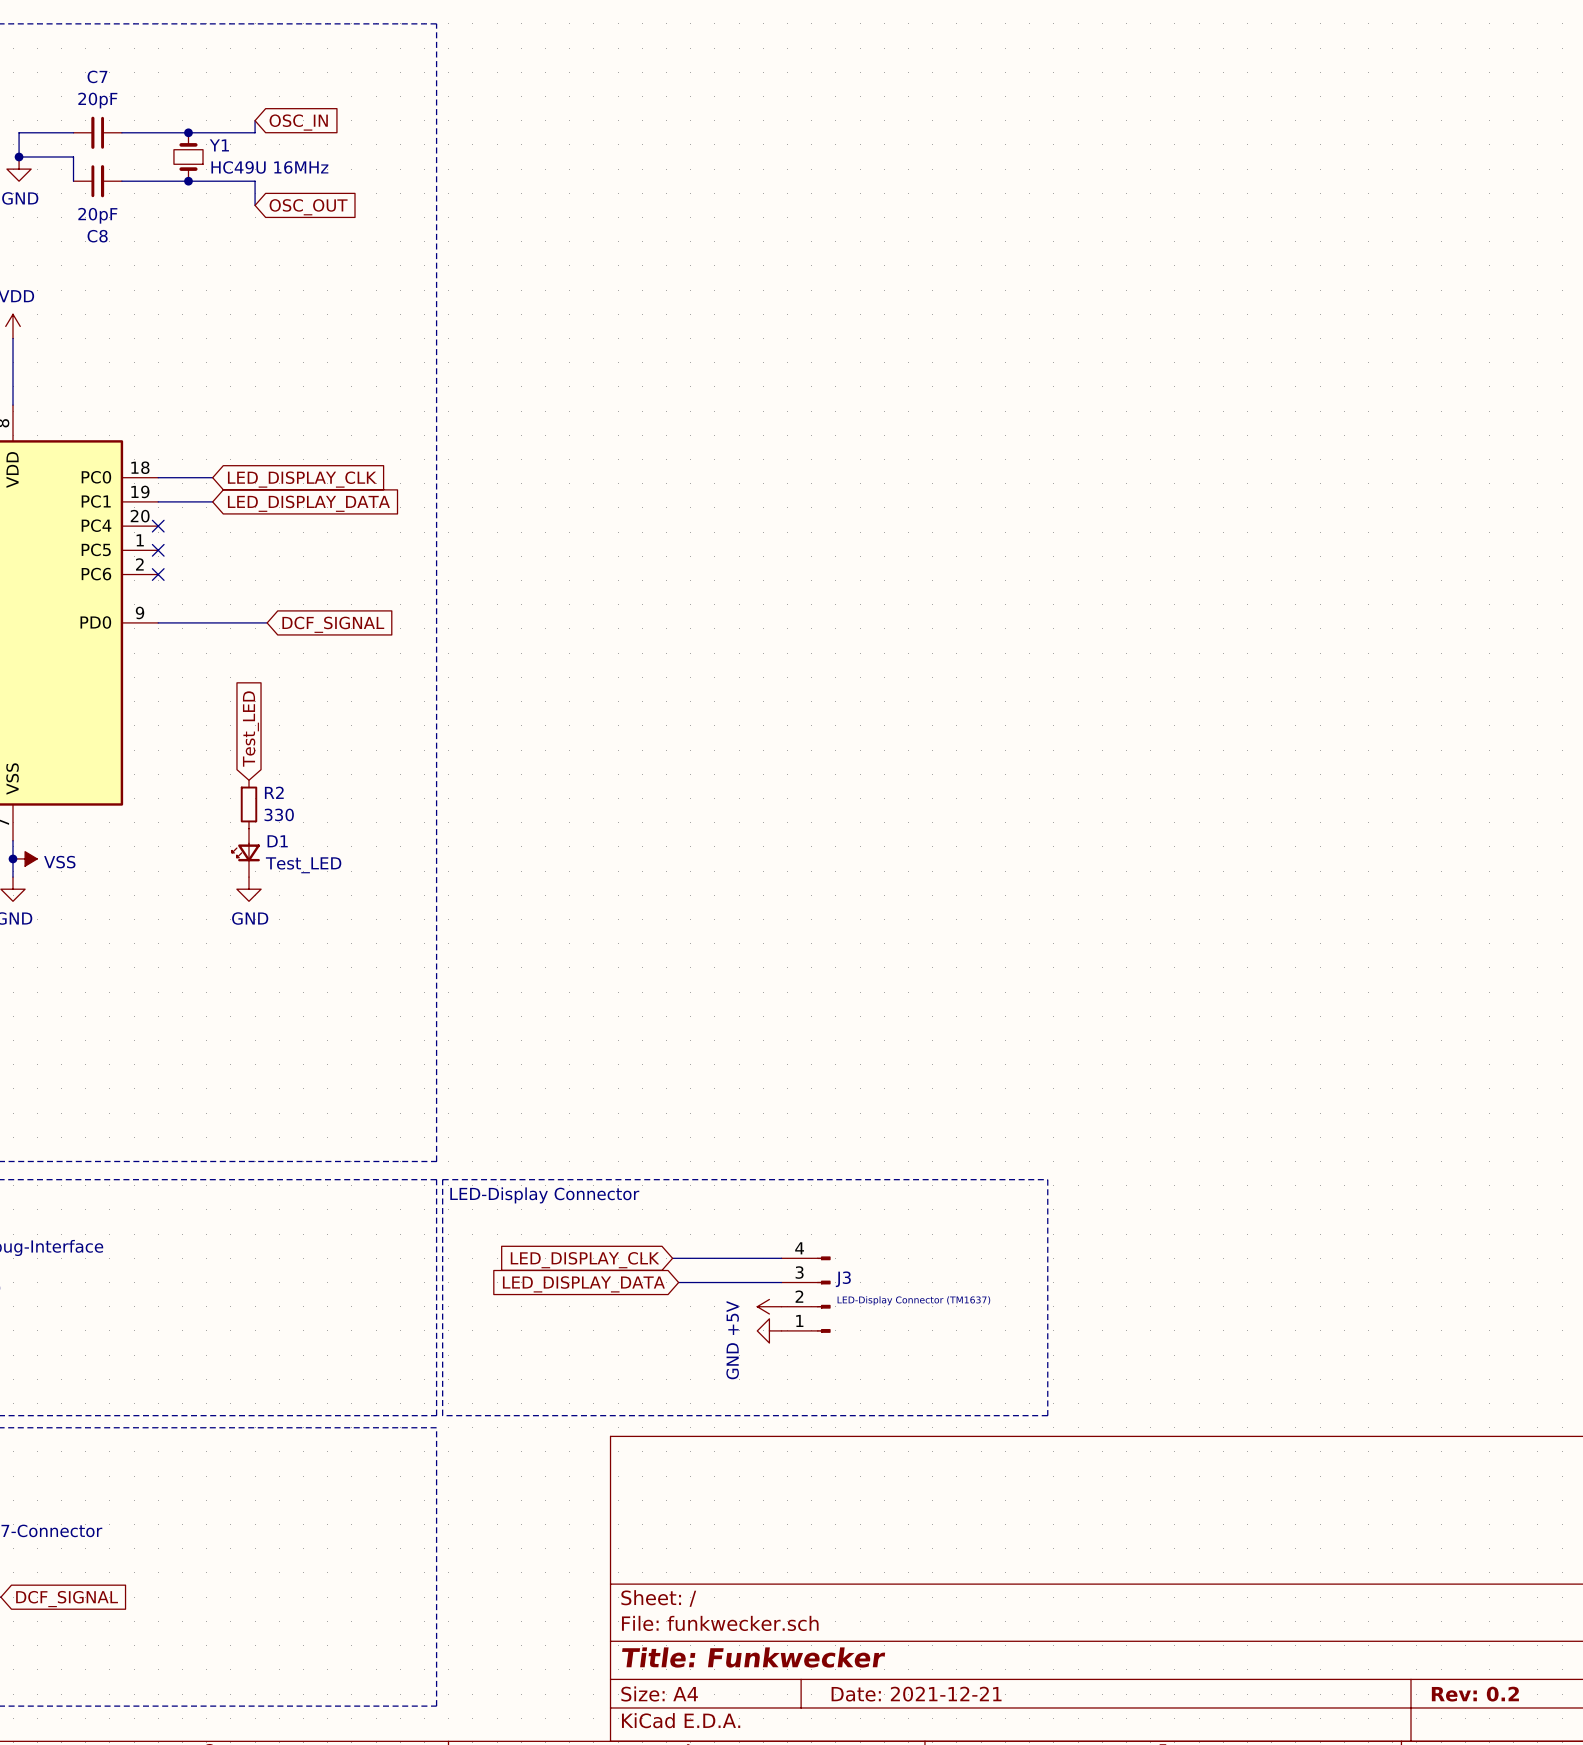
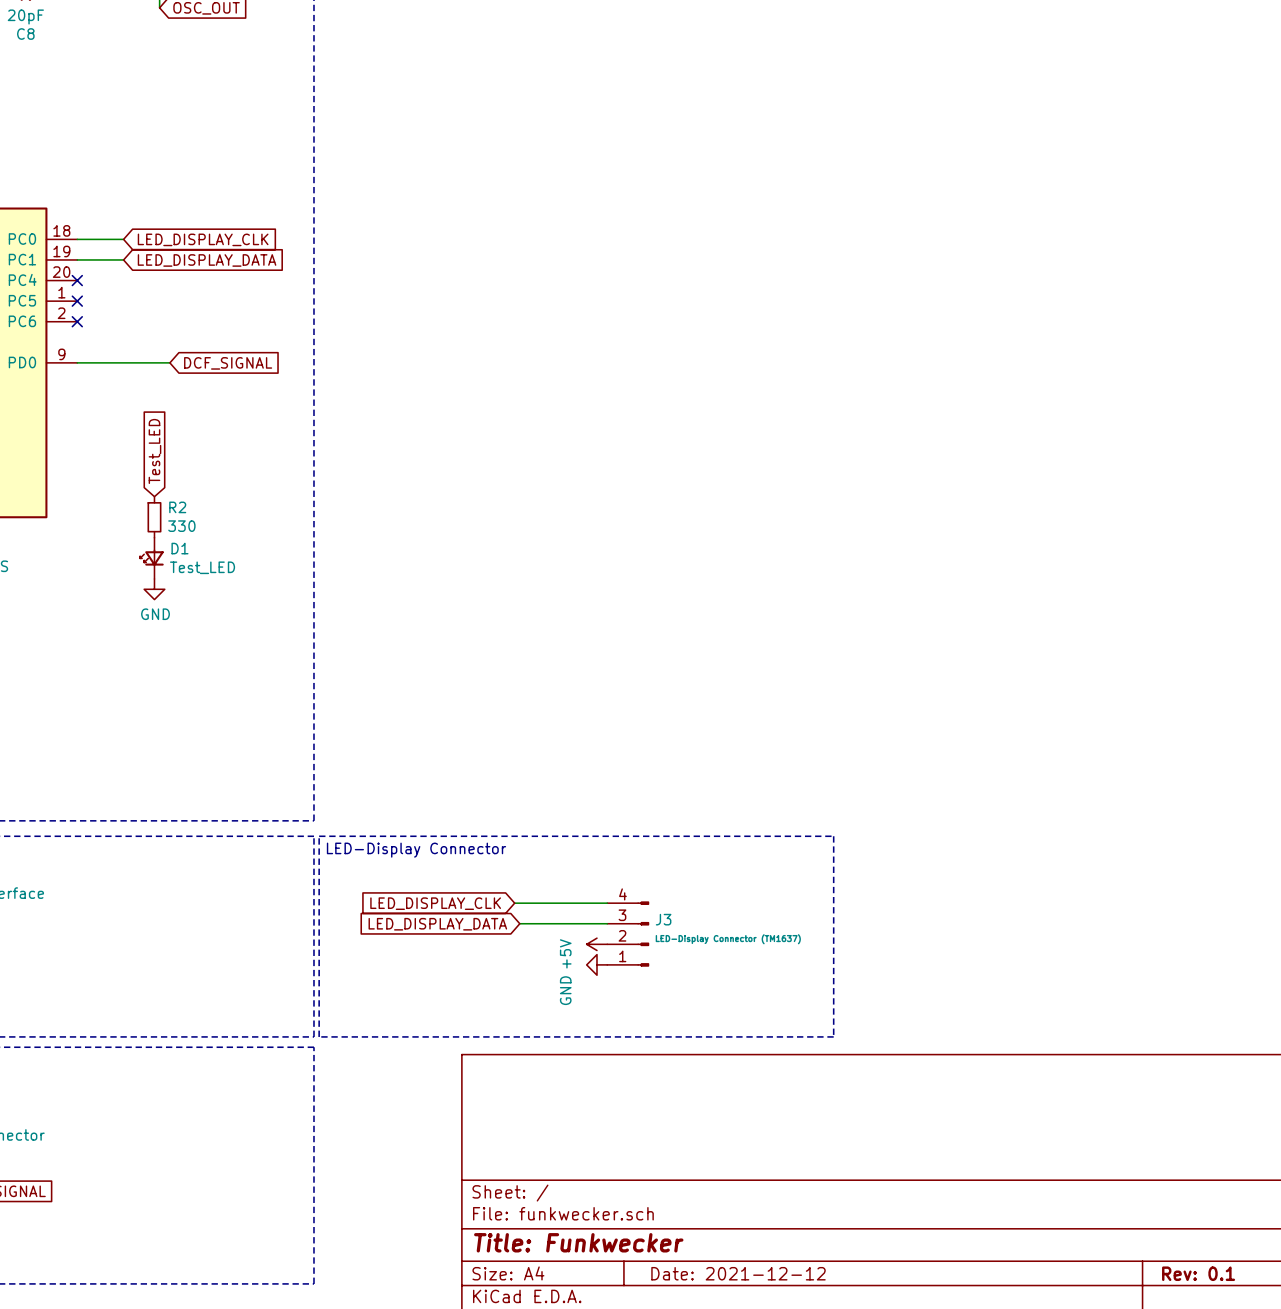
title block: Date: 2021-12-21 (916, 1694) -> Date: 2021-12-12 (738, 1273)
title block: Rev: 0.2 (1475, 1694) -> Rev: 0.1 (1198, 1273)

